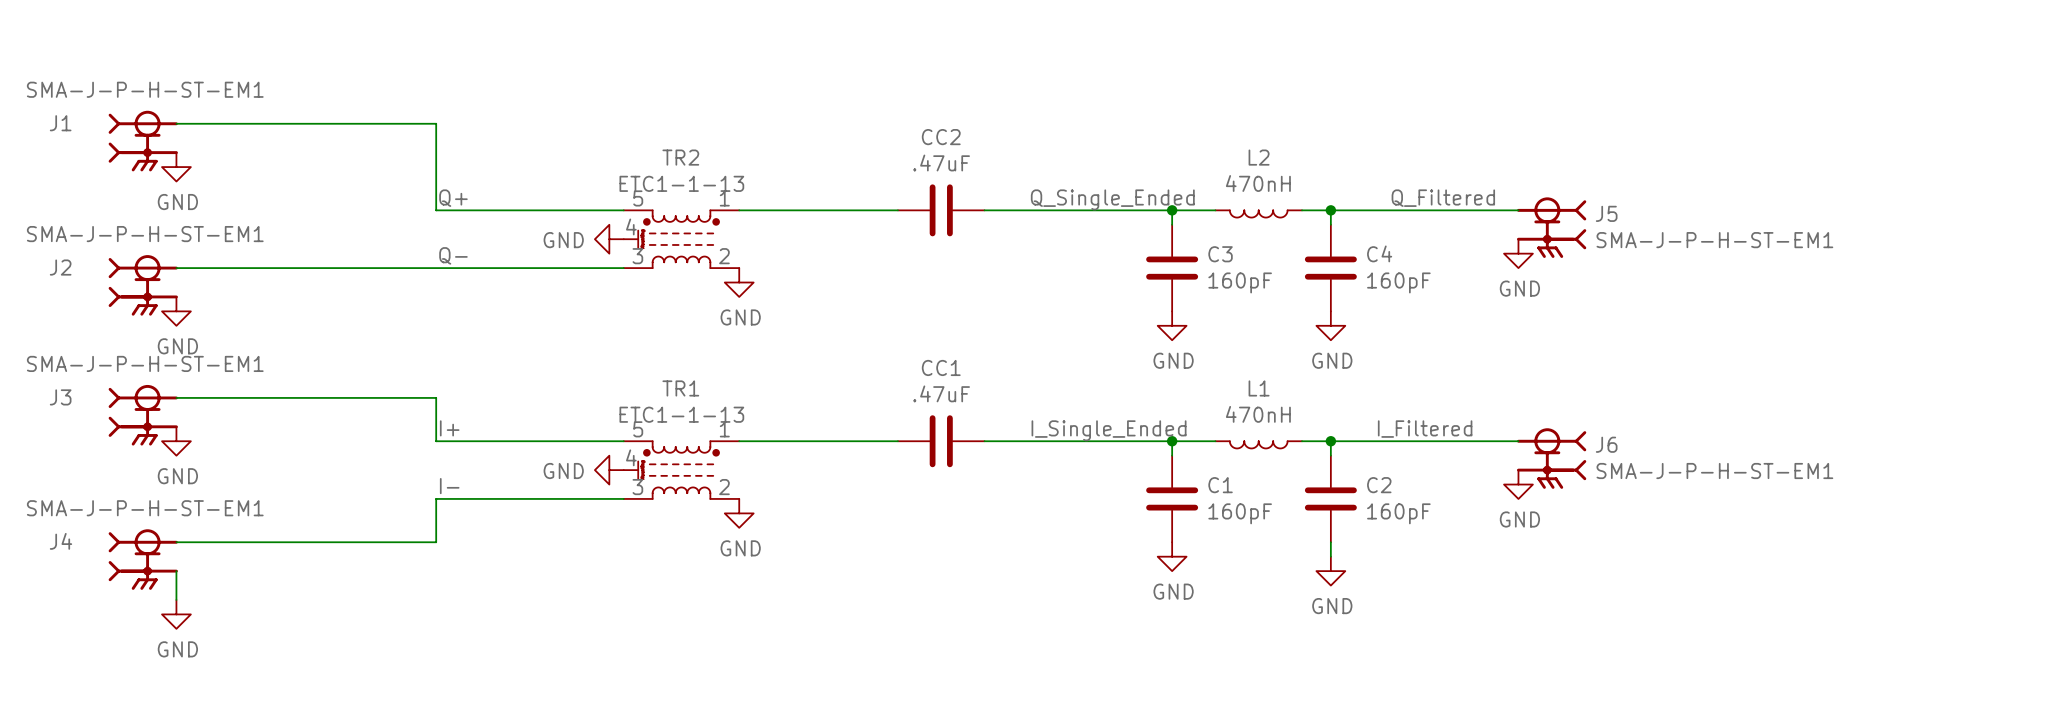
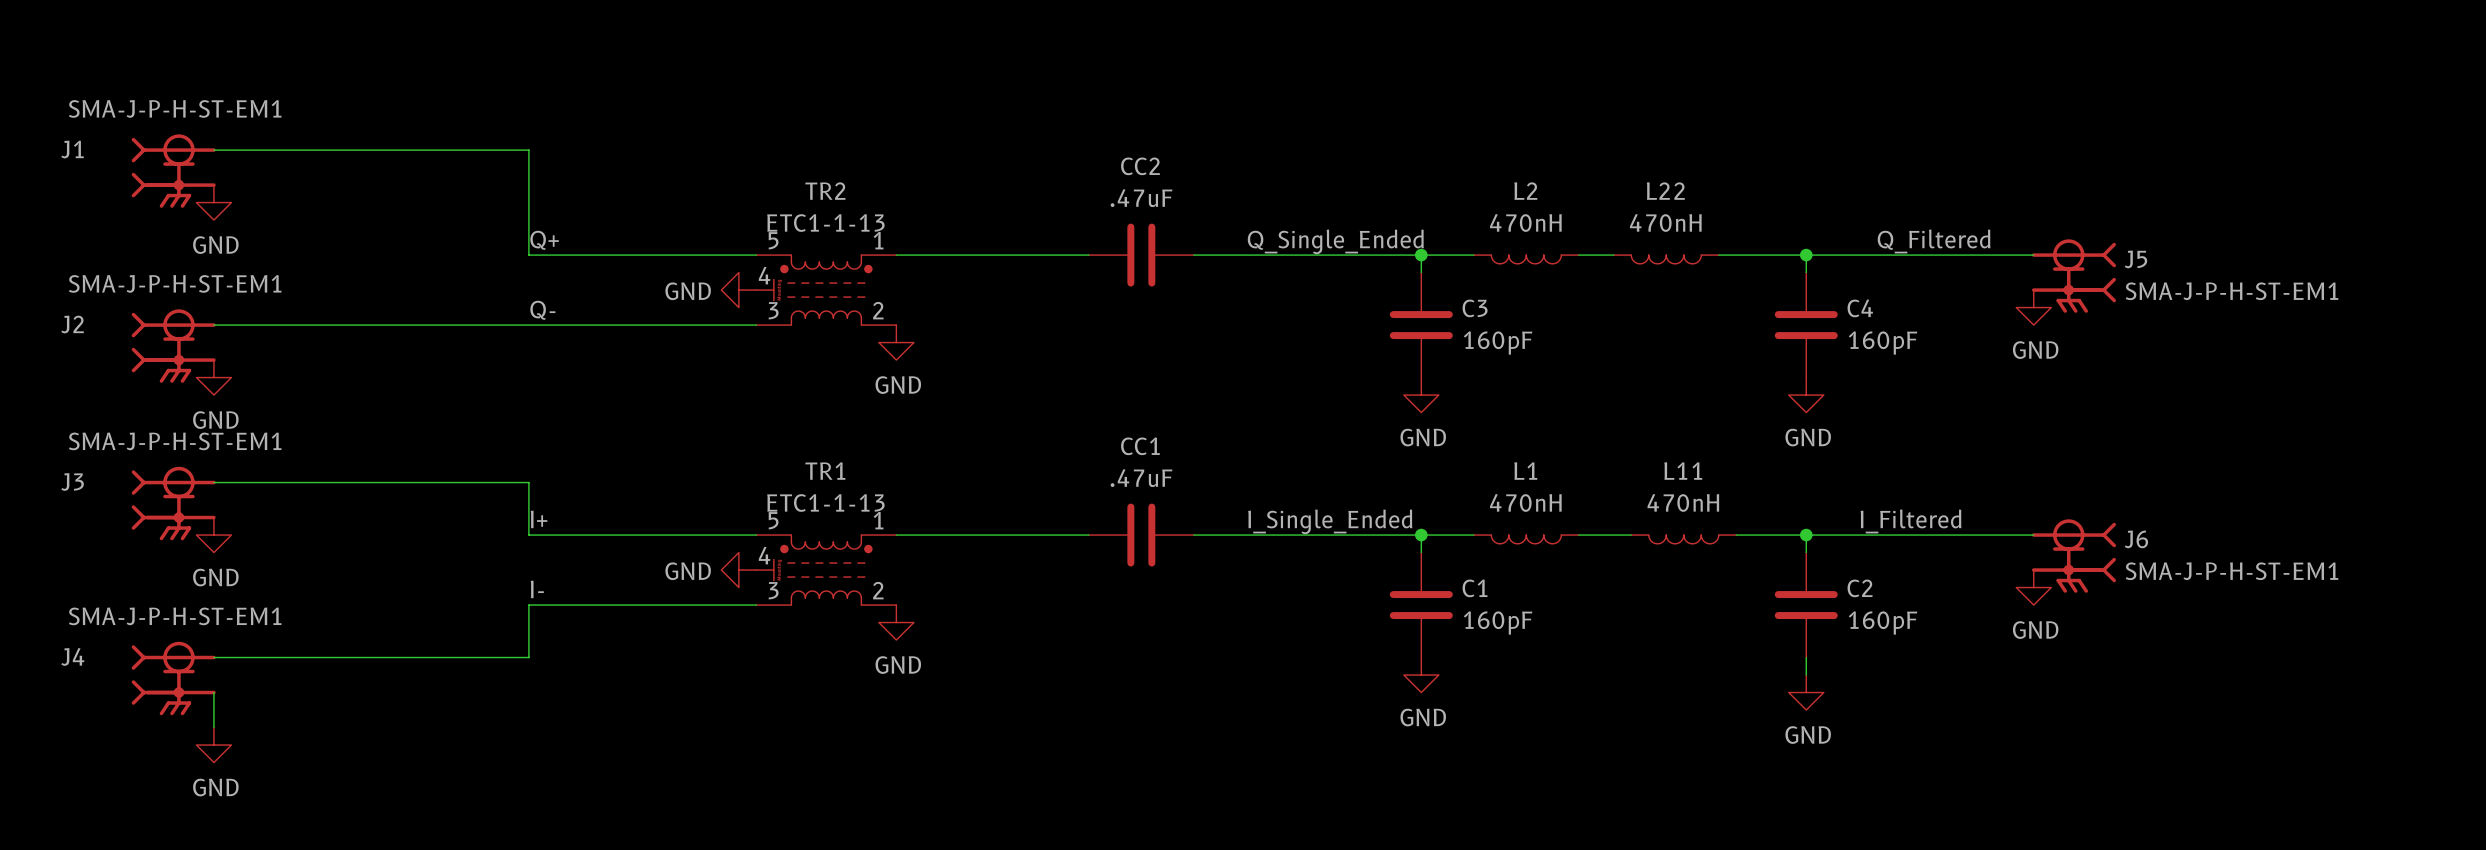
label position: Q_Filtered (1443, 198) -> Q_Filtered (1934, 241)
junction: (1330, 210) -> none
wire: (1417, 210) (1330, 210) (1330, 224) -> none
wire: none -> (1806, 255) (1806, 272)
junction: none -> (1806, 255)
wire: none -> (1841, 255) (2033, 255)
L22: none -> 470nH (1666, 259)
J5 position: (1551, 227) -> (2074, 276)
power symbol position: GND (1518, 253) -> GND (1806, 395)
power symbol: none -> GND (2033, 307)
C4 position: (1330, 268) -> (1806, 325)
power symbol: GND (1330, 325) -> none
label position: I_Filtered (1425, 429) -> I_Filtered (1911, 521)
wire: (1330, 441) (1330, 455) -> (1806, 535) (1806, 552)
junction: (1330, 441) -> none
wire: (1345, 441) (1431, 441) -> none
junction: none -> (1806, 535)
wire: none -> (1841, 535) (2033, 535)
L11: none -> 470nH (1683, 539)
J6 position: (1551, 458) -> (2074, 556)
power symbol: GND (1518, 484) -> none
power symbol: none -> GND (2033, 587)
C2 position: (1330, 498) -> (1806, 605)
wire: (1330, 542) (1330, 556) -> (1806, 657) (1806, 675)
power symbol: GND (1330, 571) -> none
power symbol: none -> GND (1806, 692)

